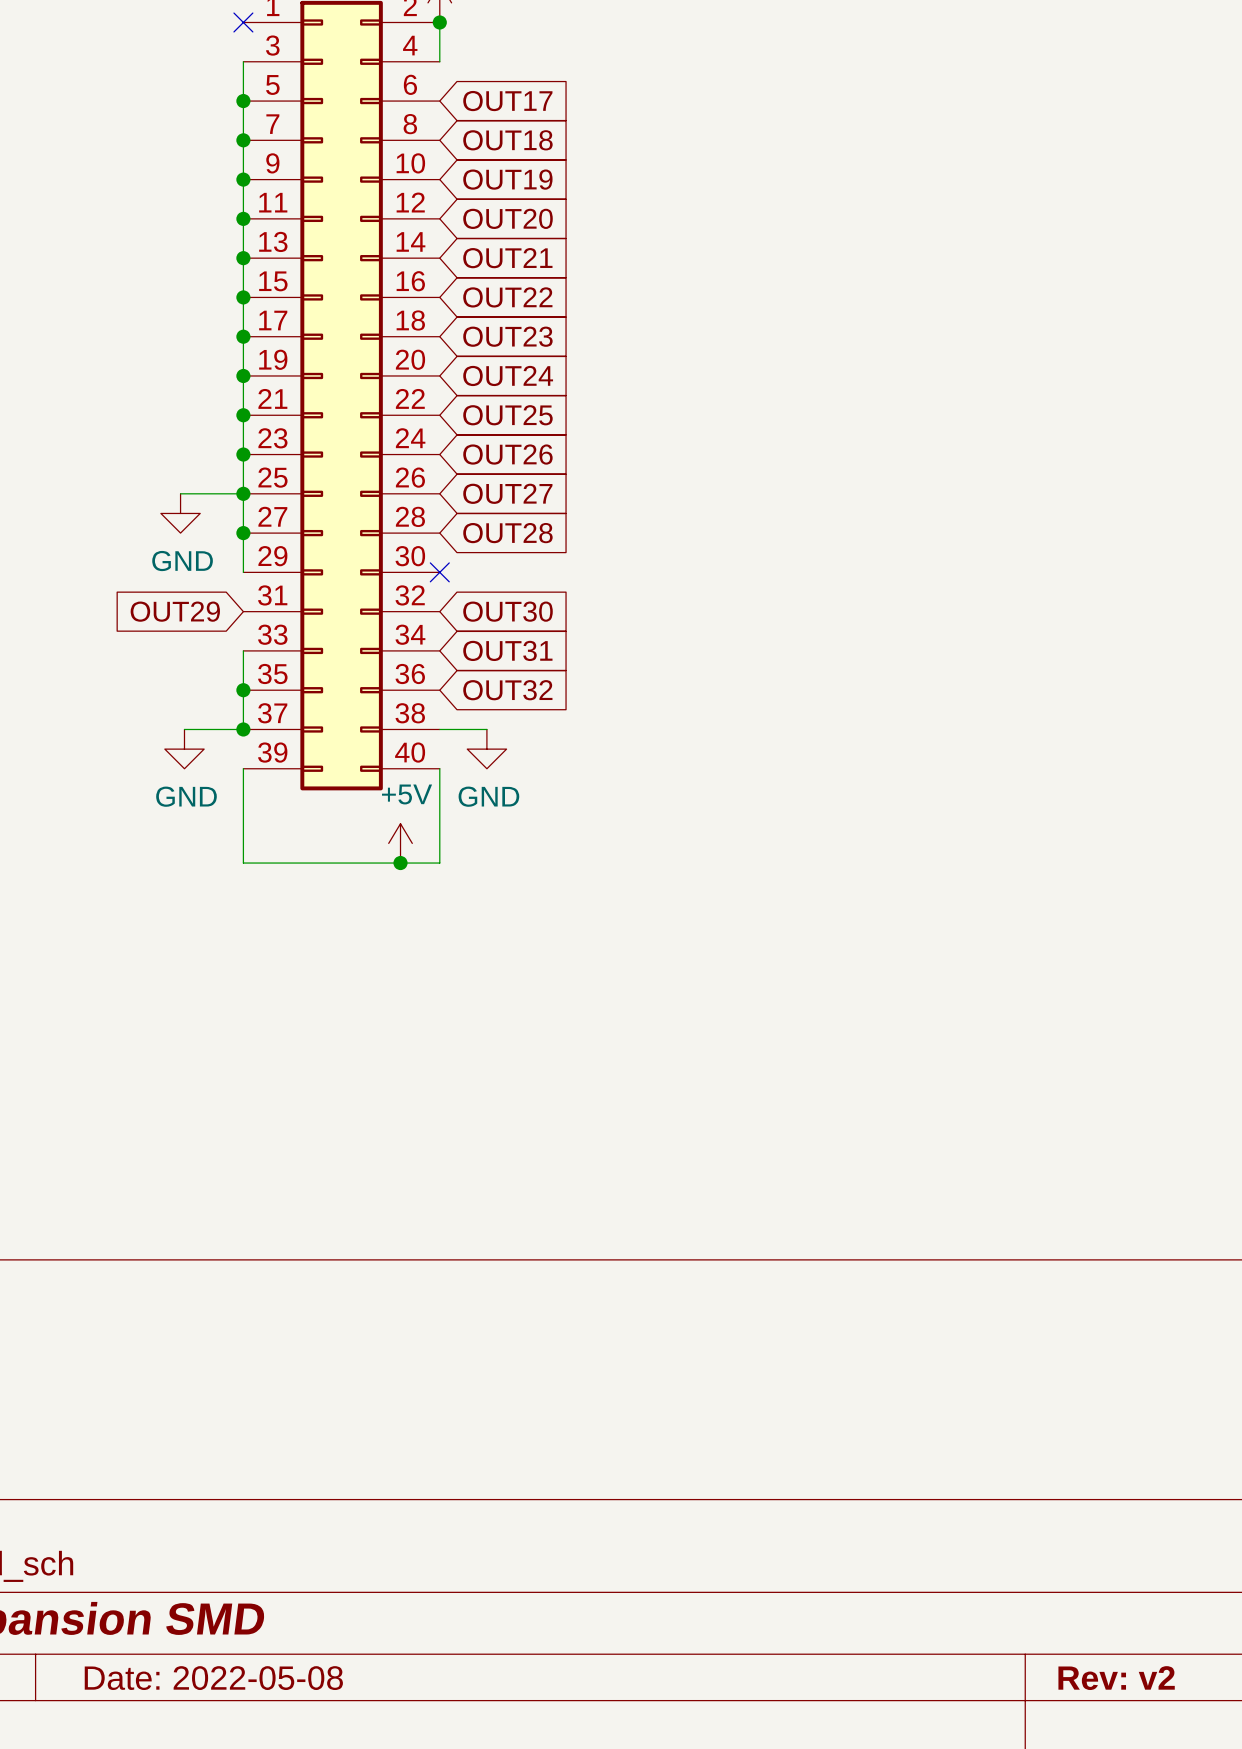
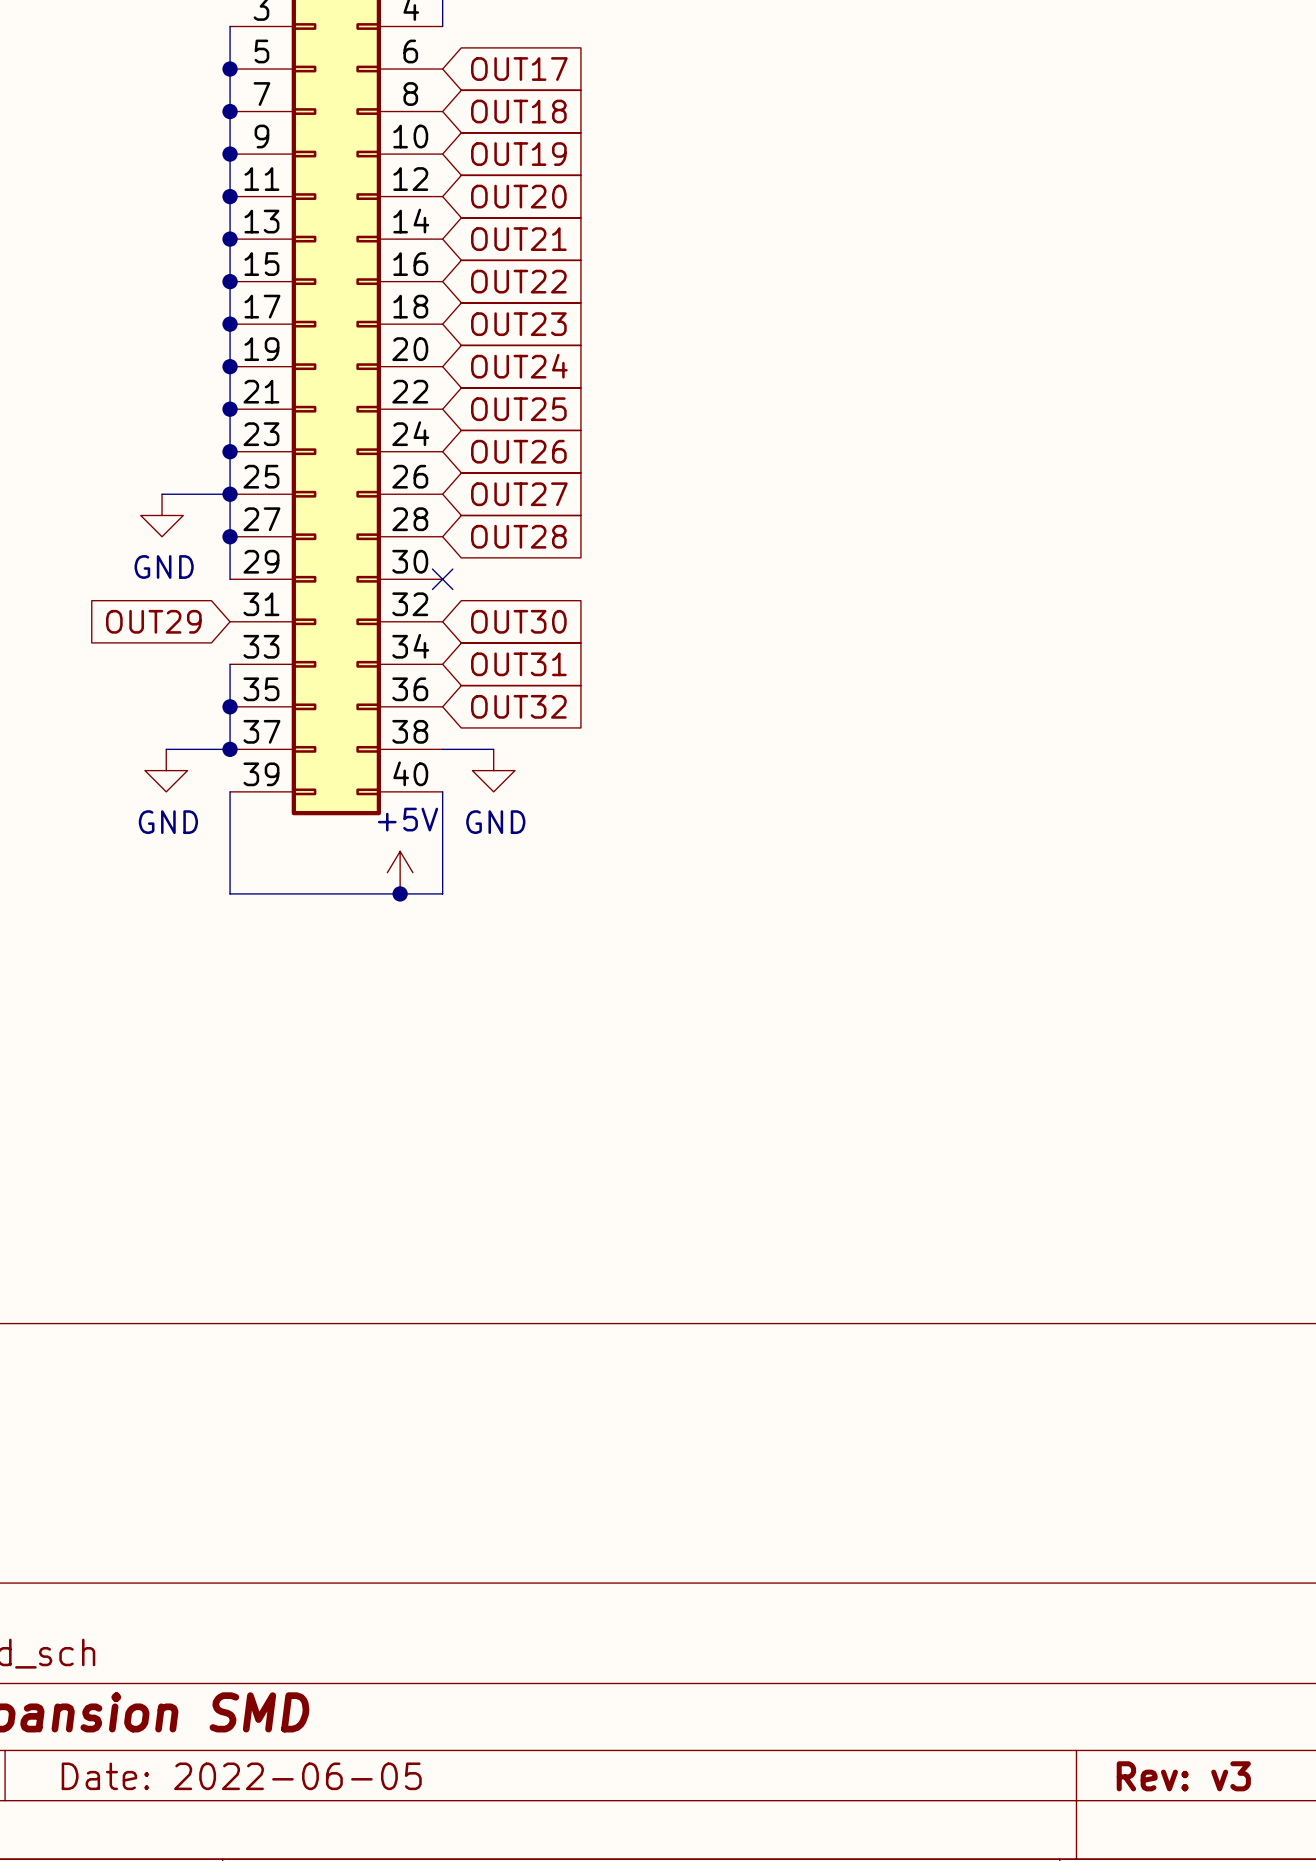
title block: Date: 2022-05-08 (213, 1678) -> Date: 2022-06-05 (241, 1776)
title block: Rev: v2 (1116, 1678) -> Rev: v3 (1183, 1776)

